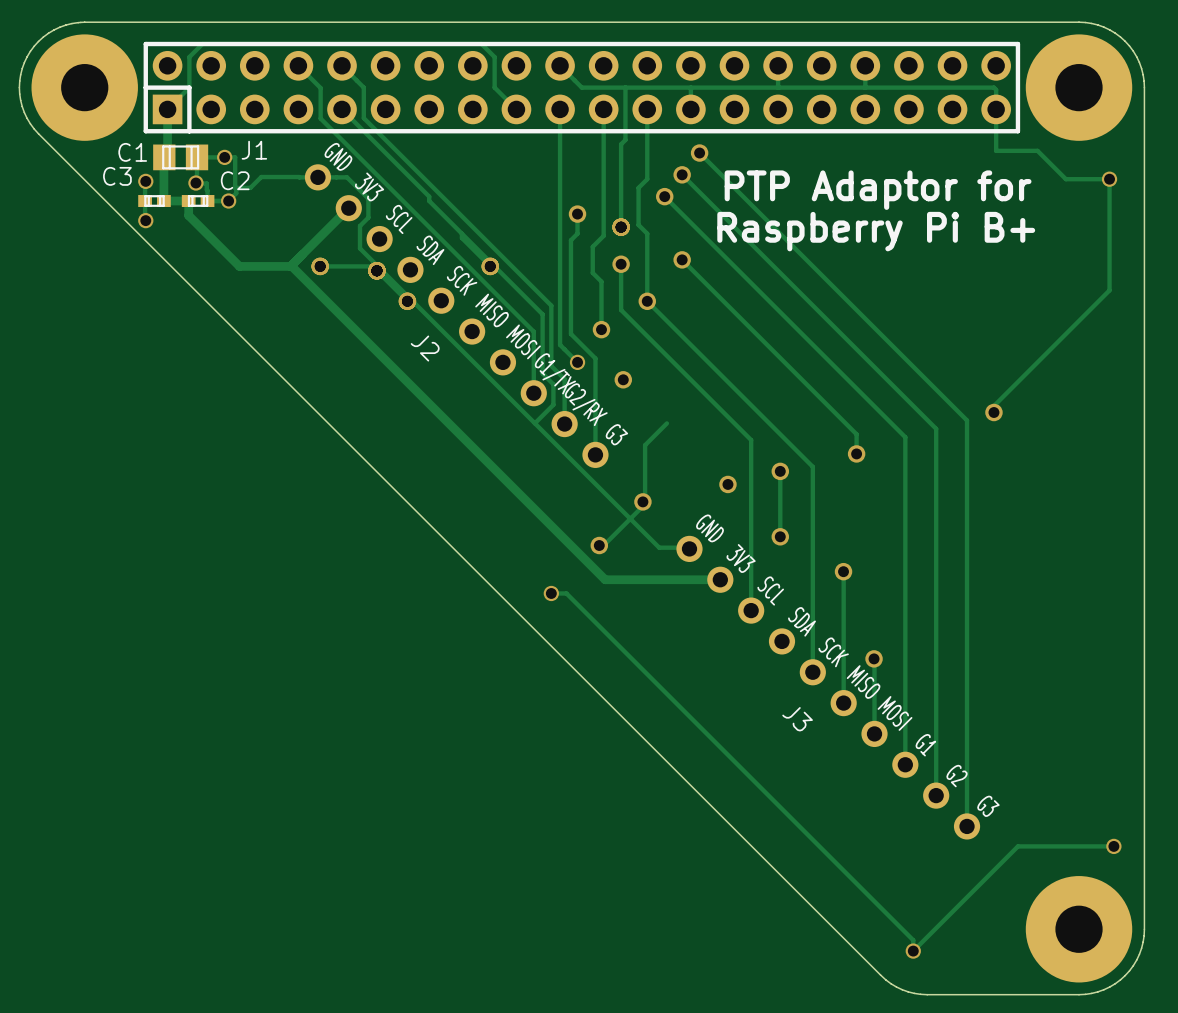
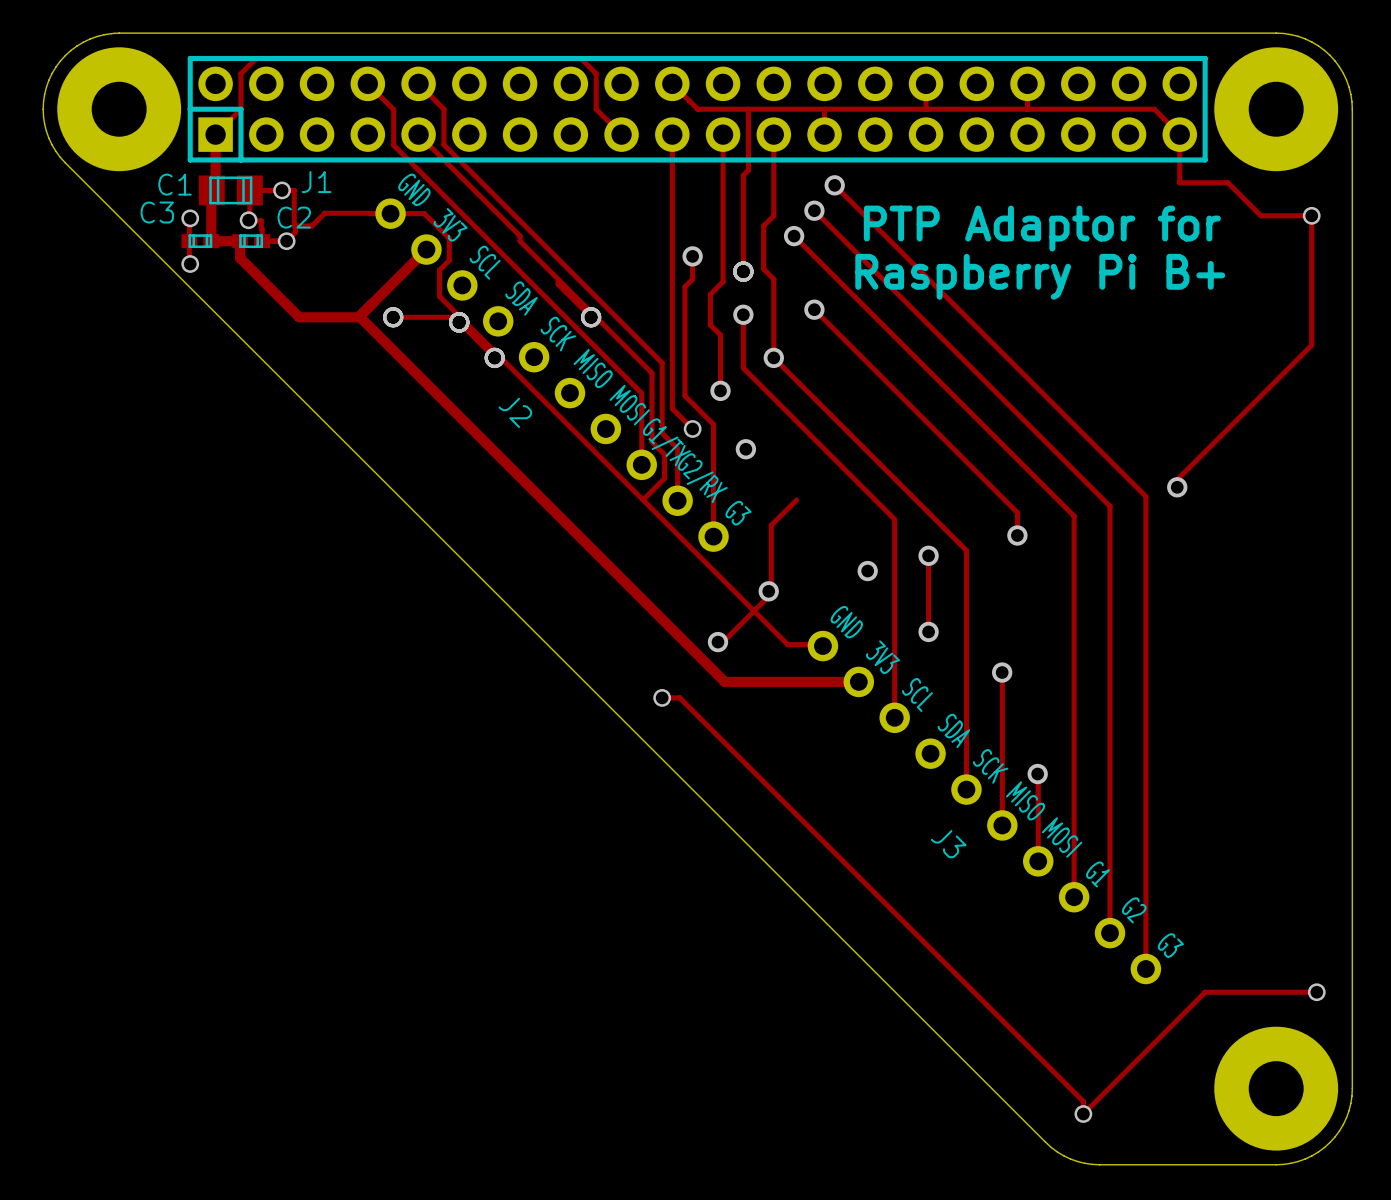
track: (974, 87) (993, 87) (996, 89) (996, 109) -> (1154, 109) (1179, 134)

